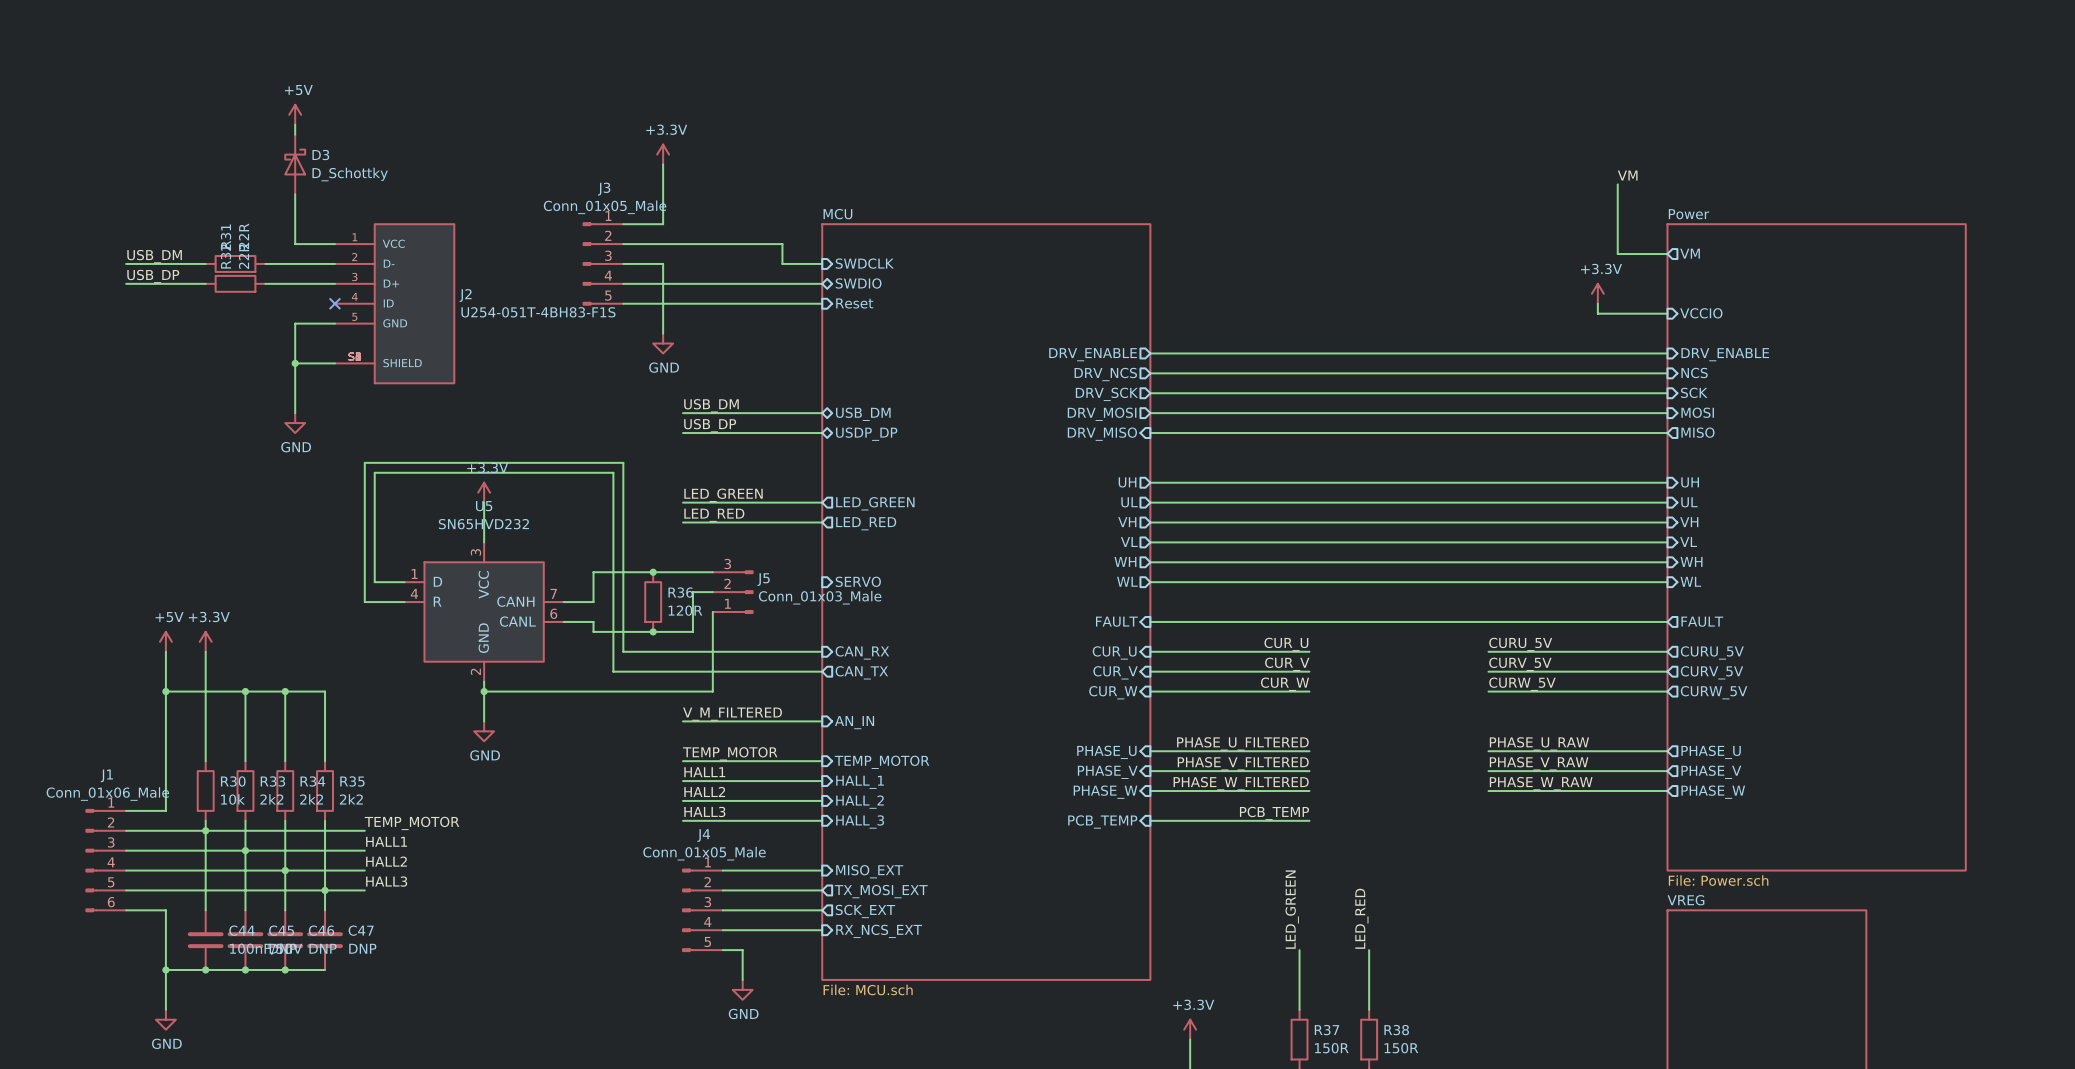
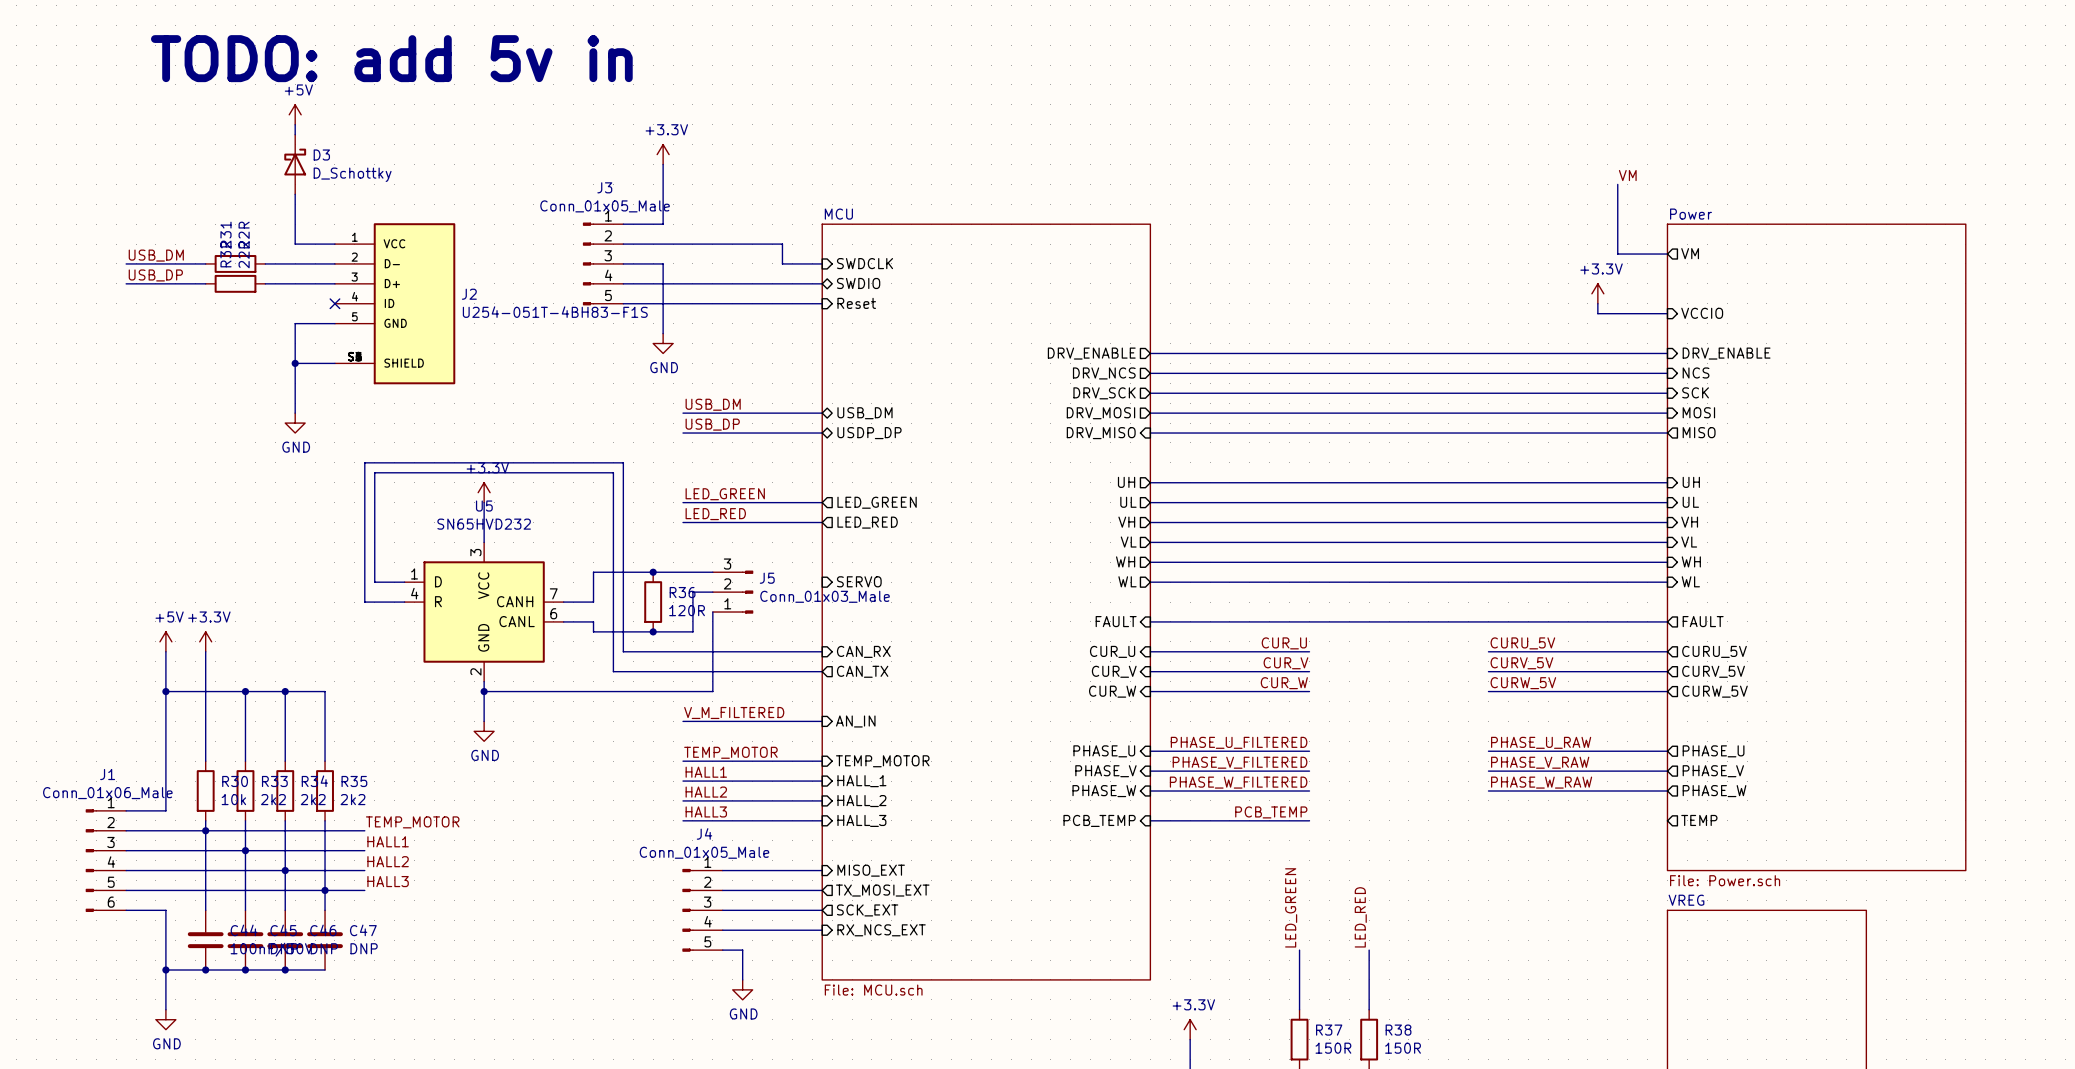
text: none -> TODO: add 5v in (391, 58)
sheet pin: none -> TEMP (1699, 820)

